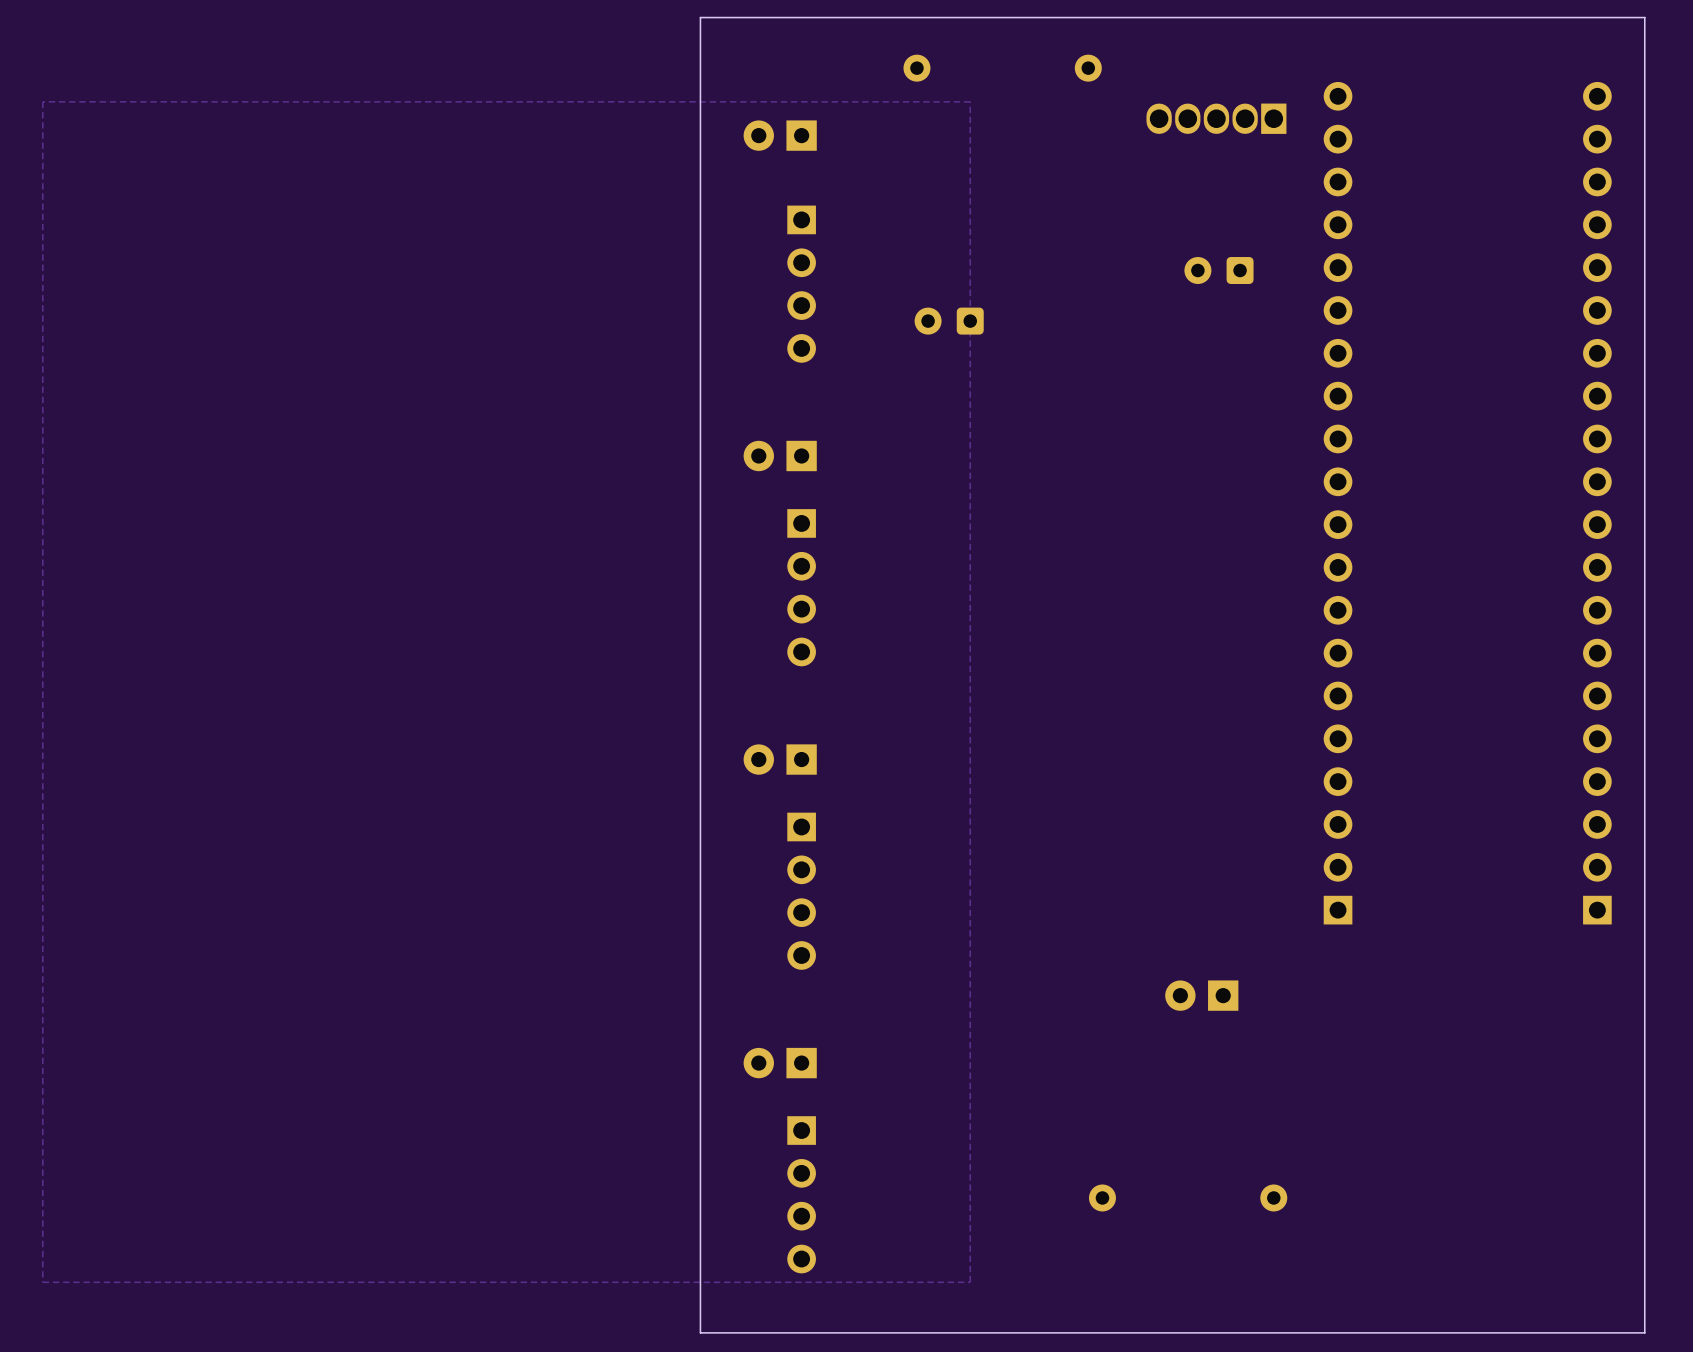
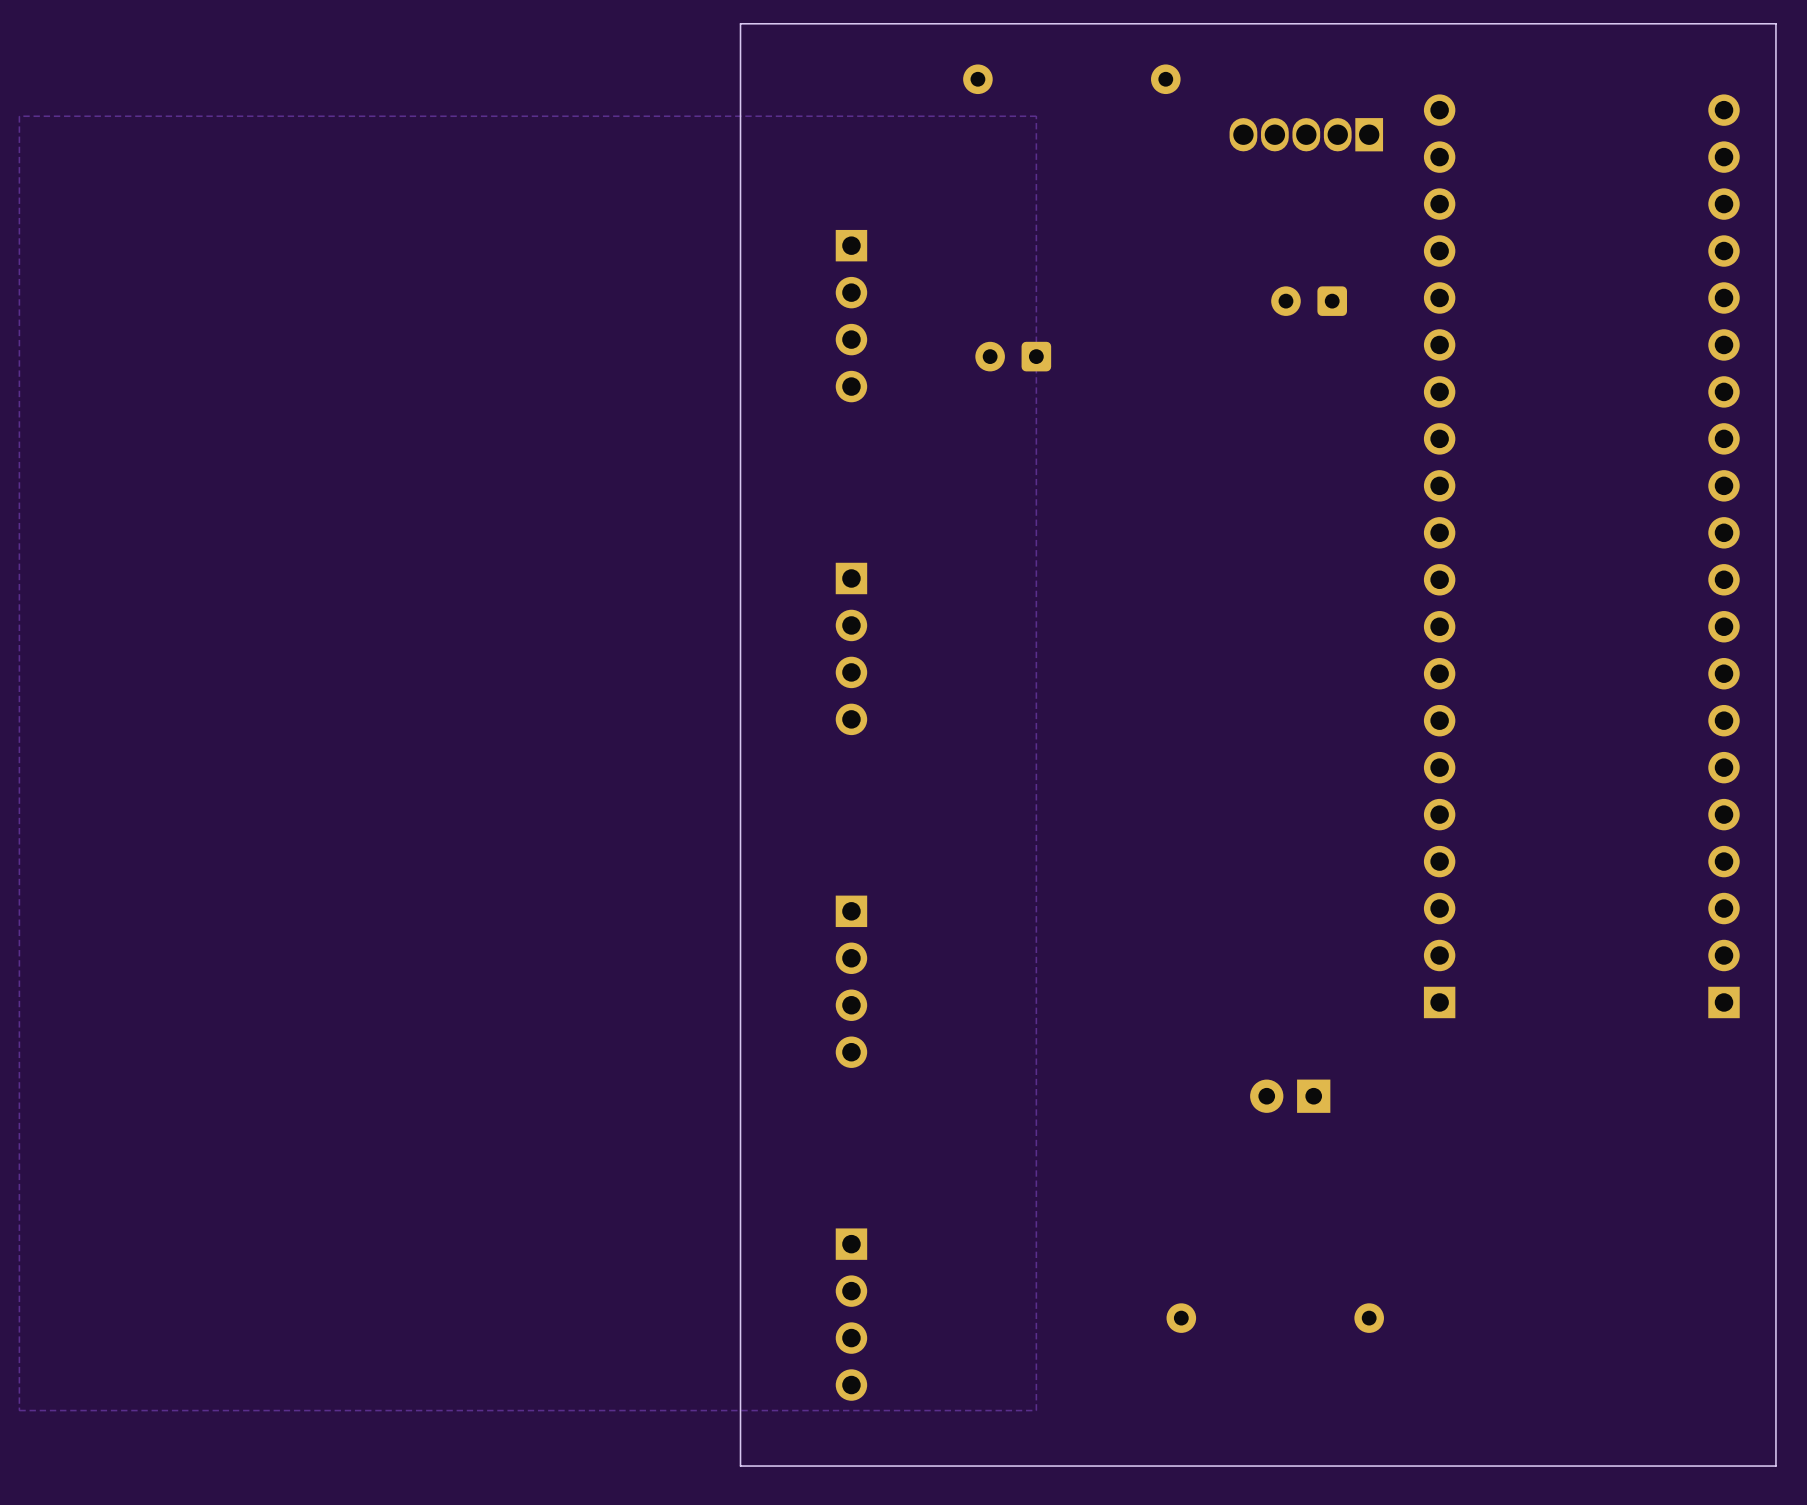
part: (780, 135) -> none
part: (780, 456) -> none
part: (780, 759) -> none
part: (780, 1063) -> none

